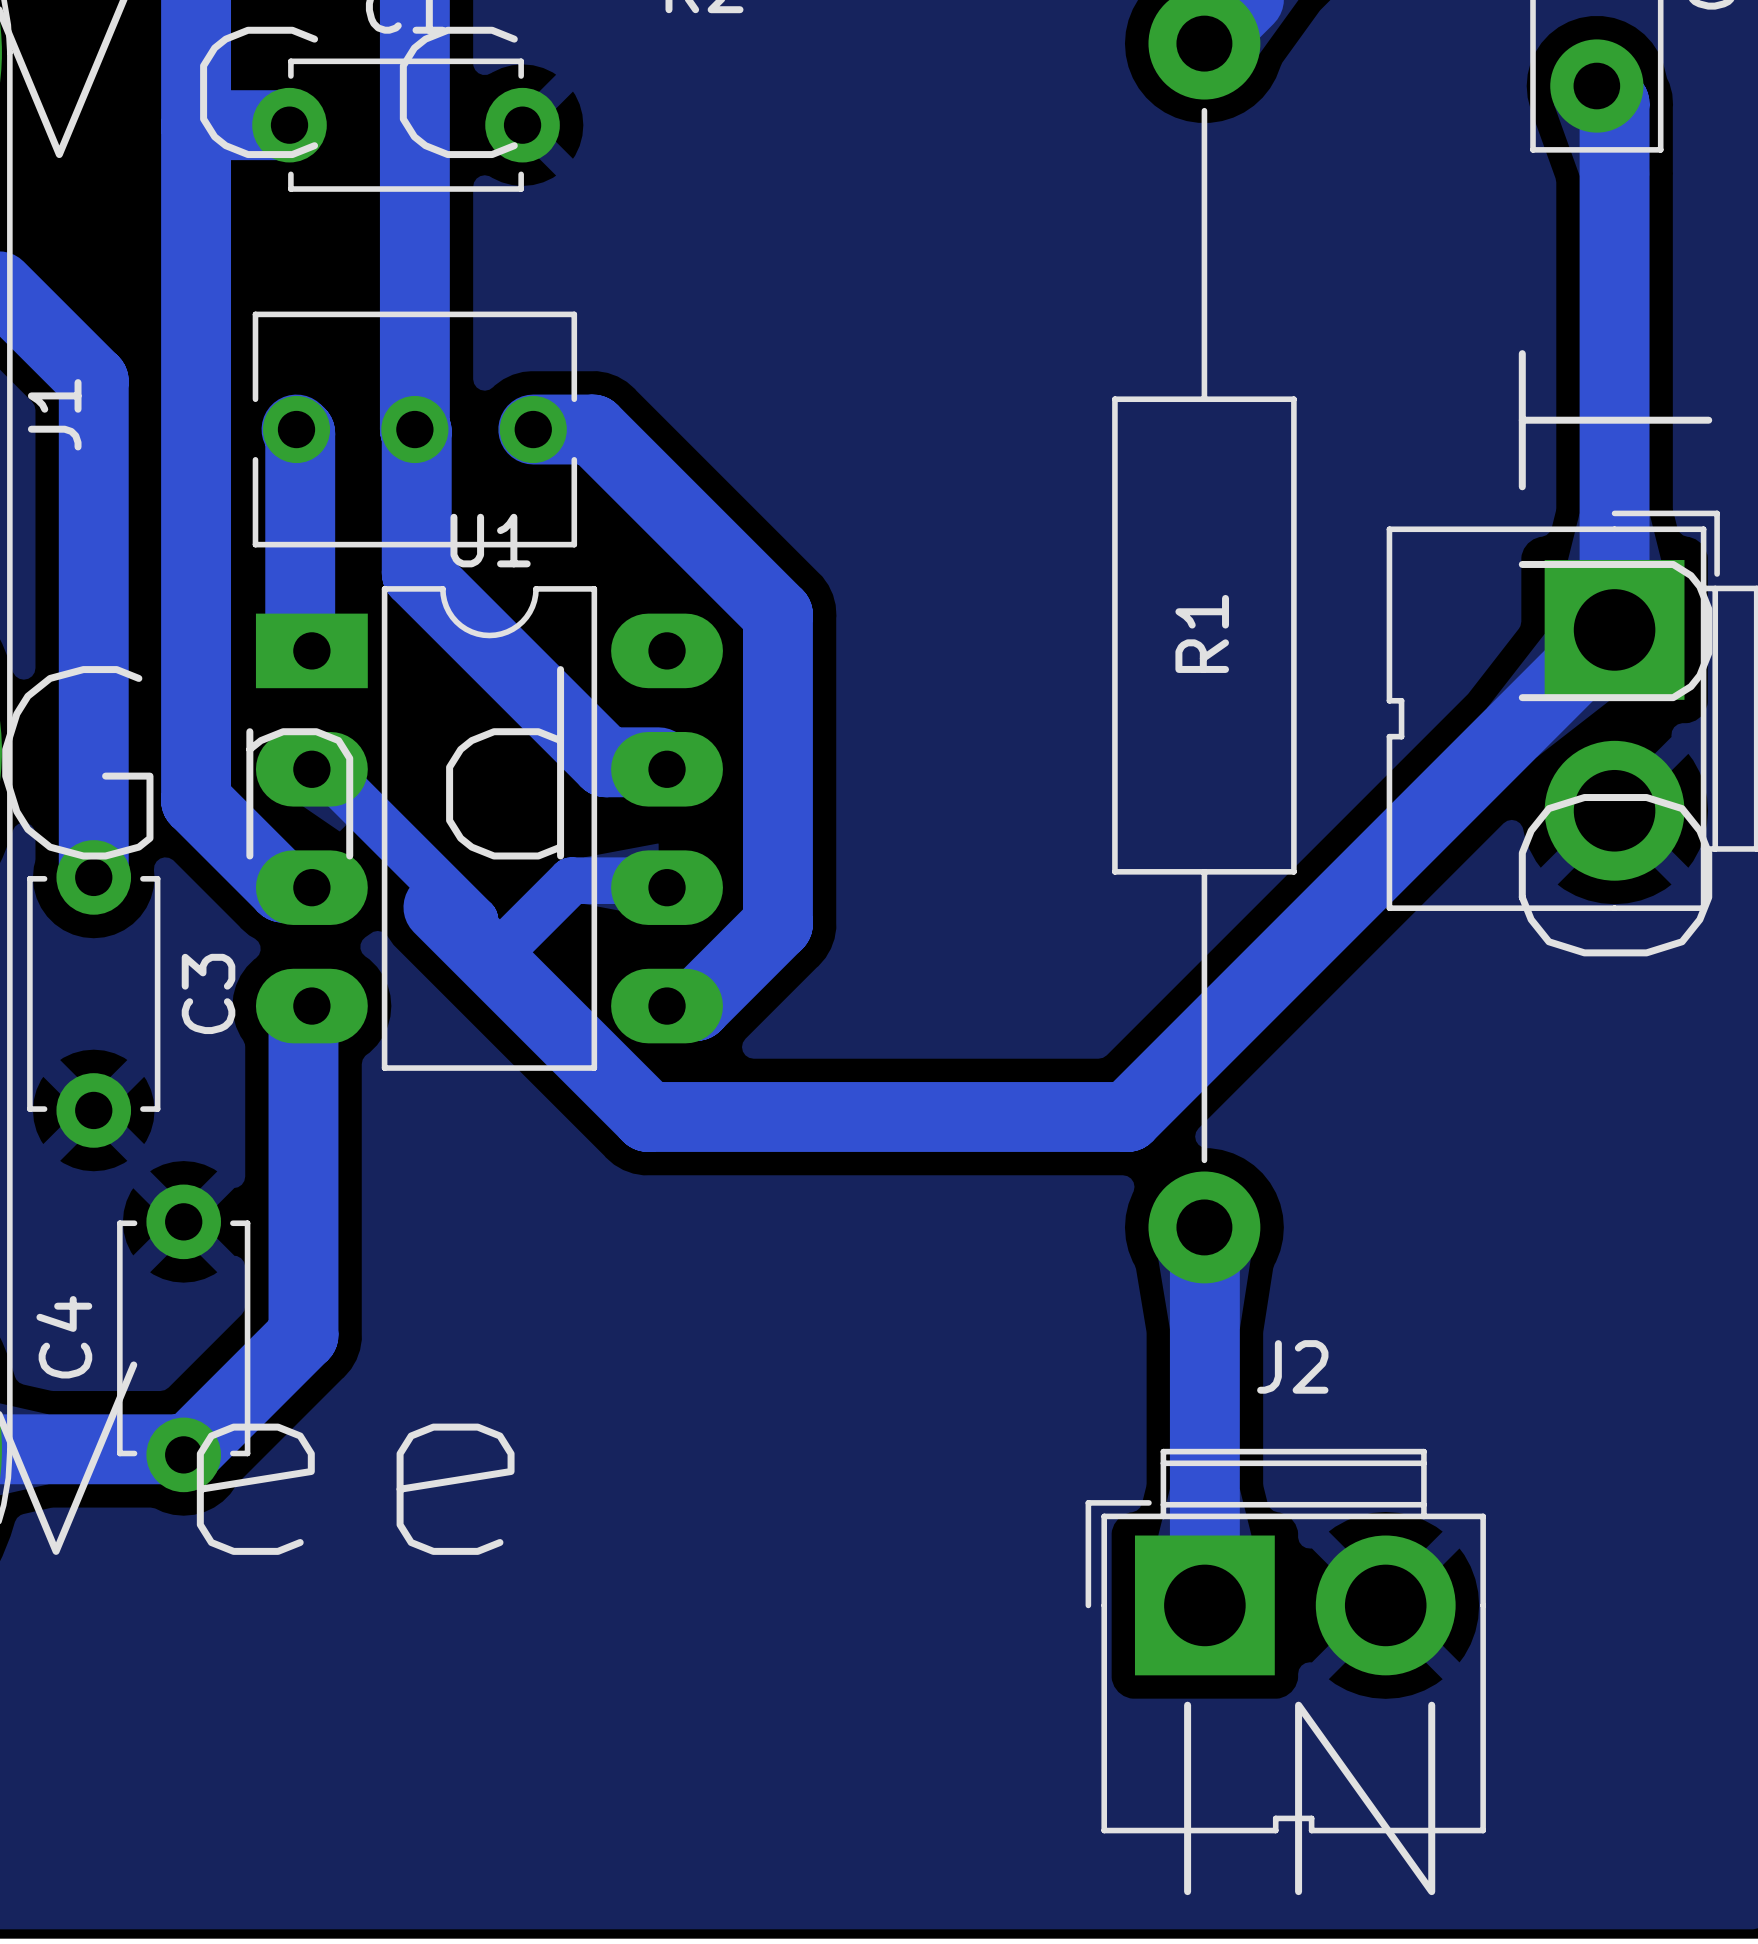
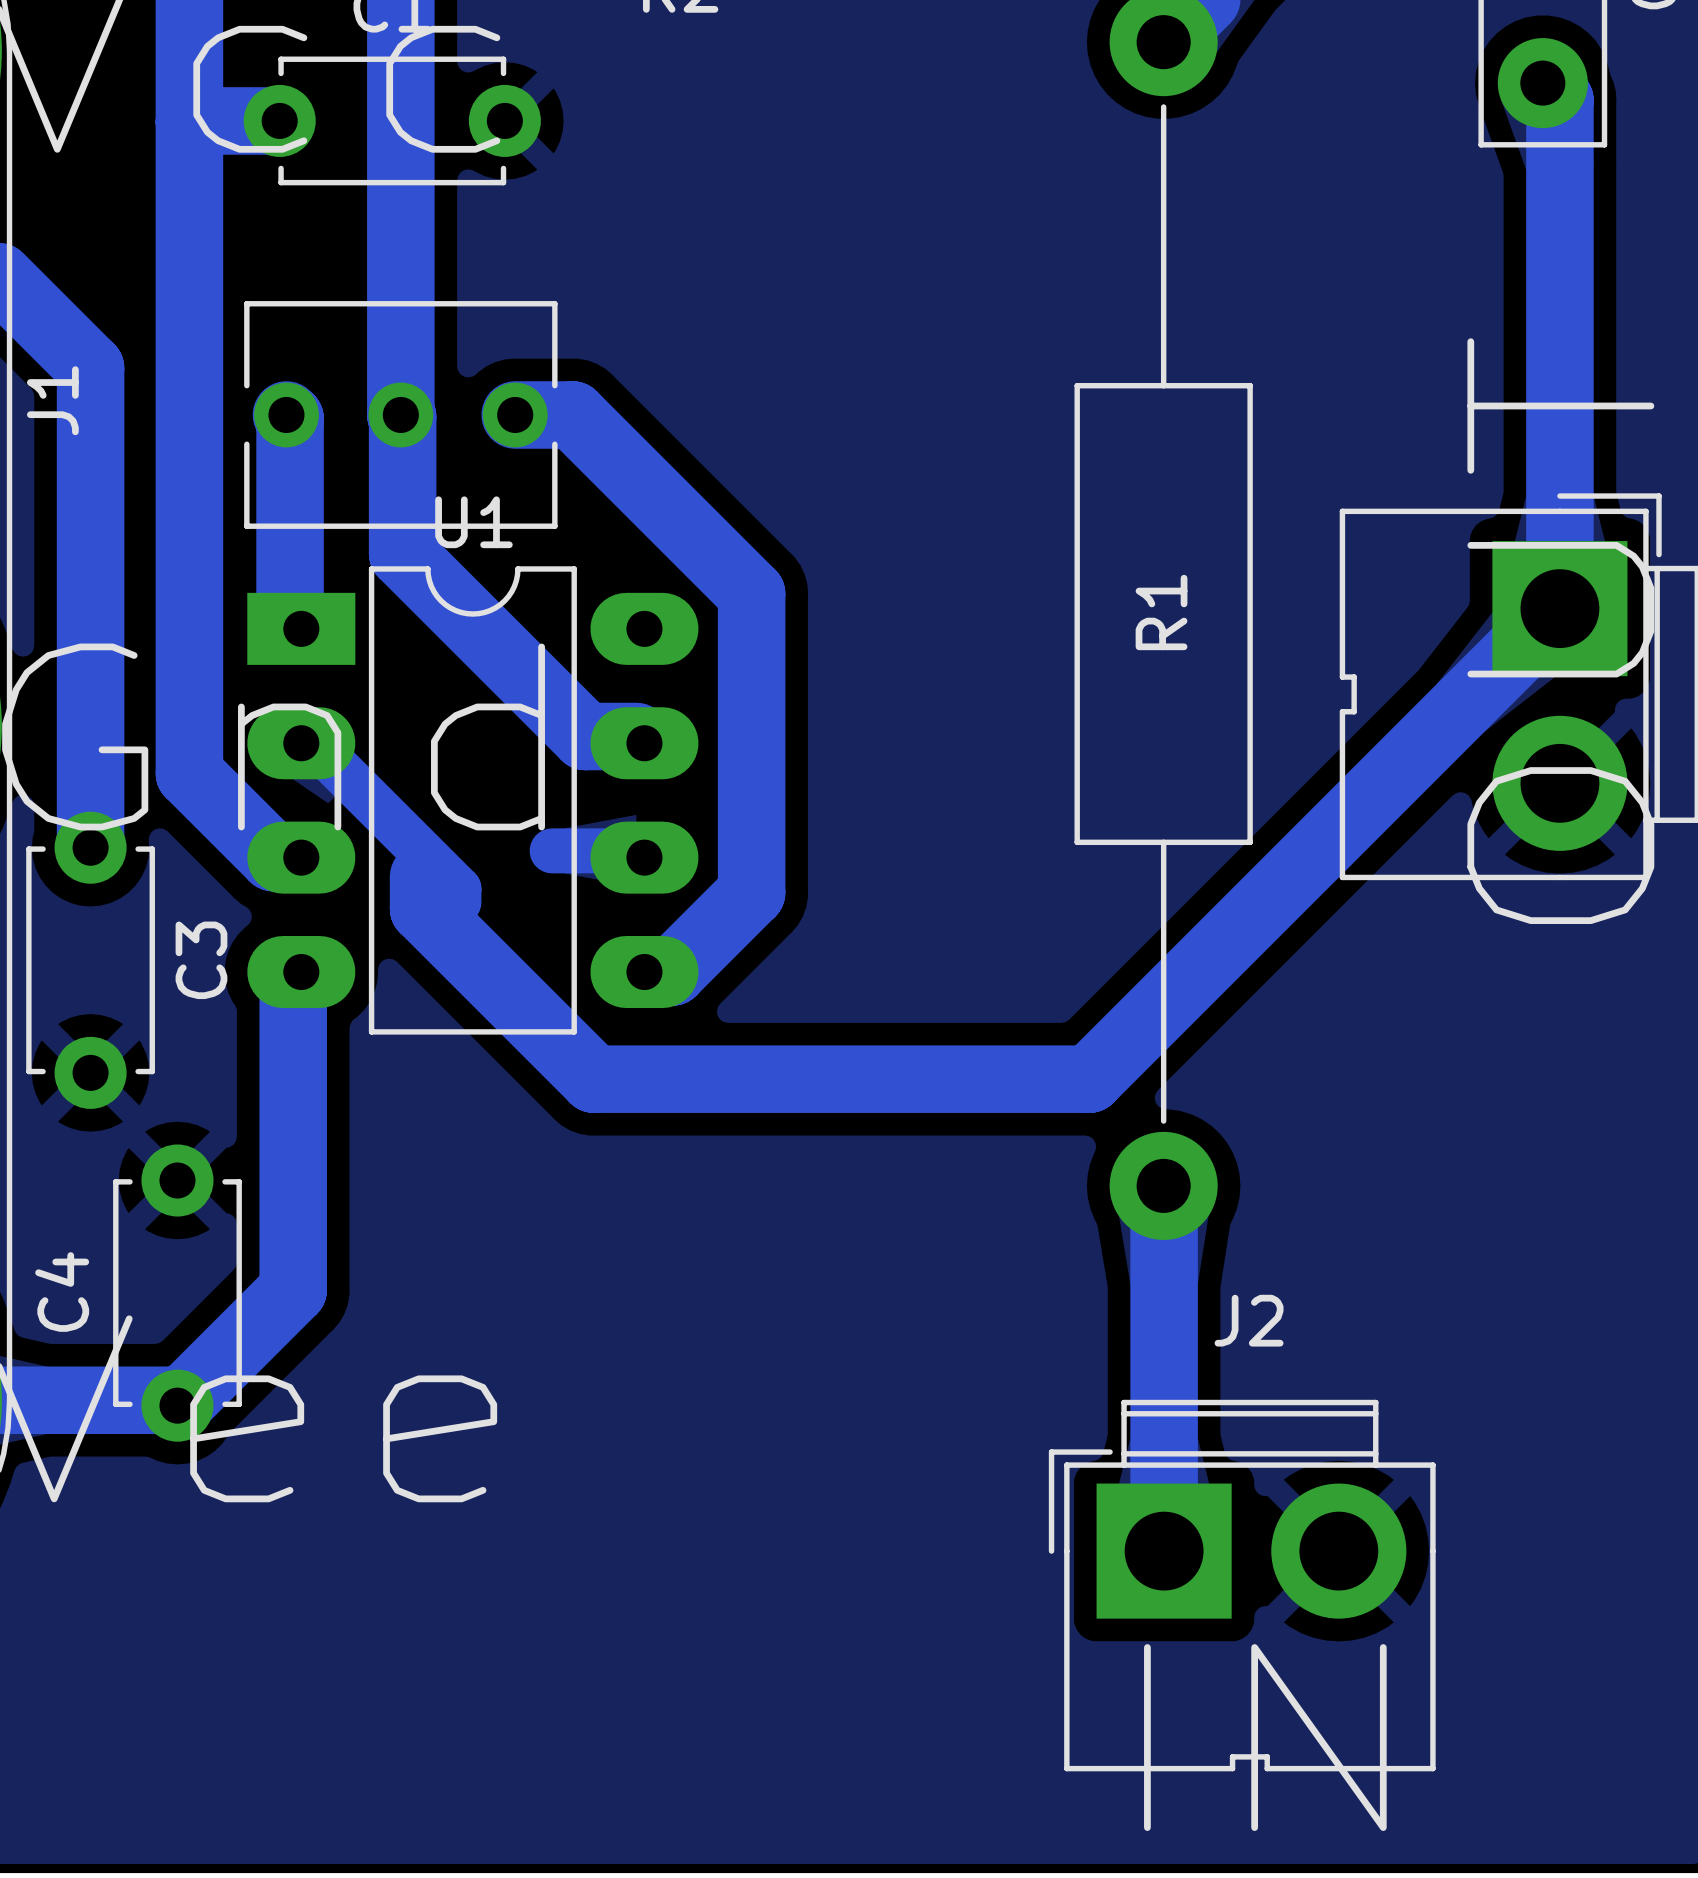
bottom track: (571, 880) (491, 960) -> none
bottom track: (438, 907) (648, 1116) -> (423, 876) (423, 908) (594, 1079) (626, 1079)

